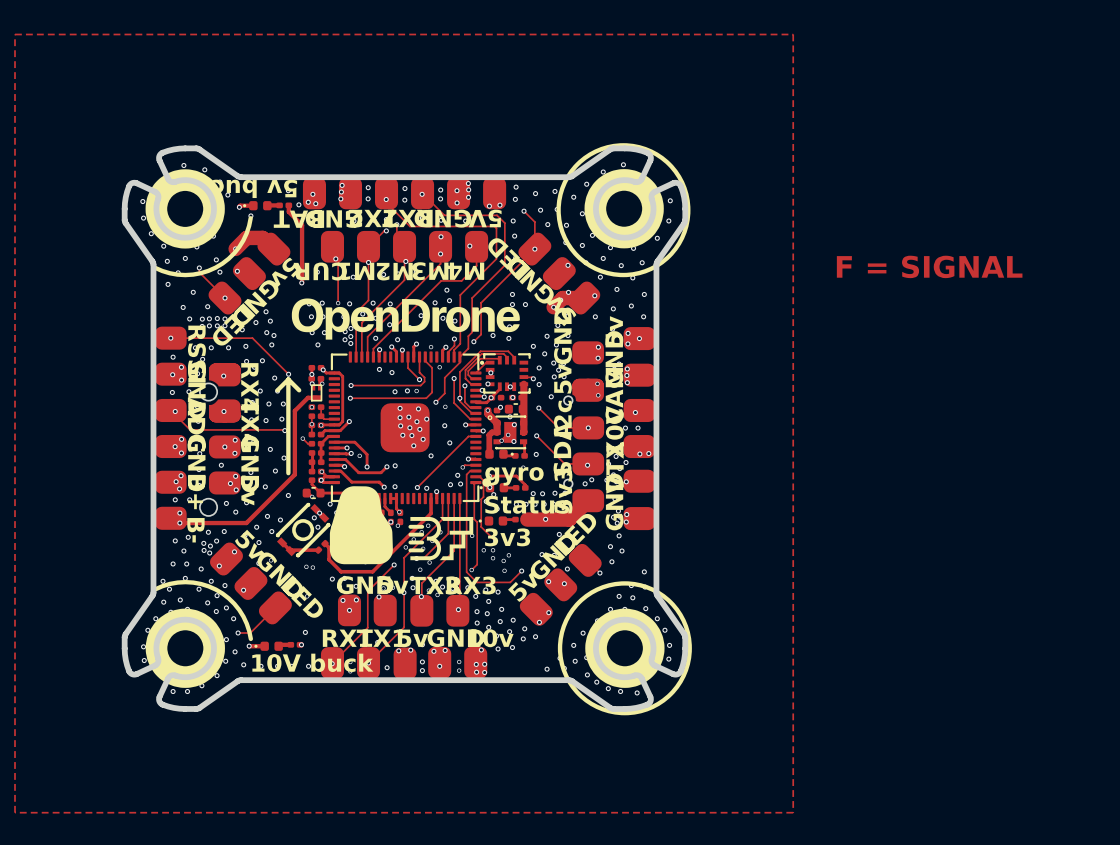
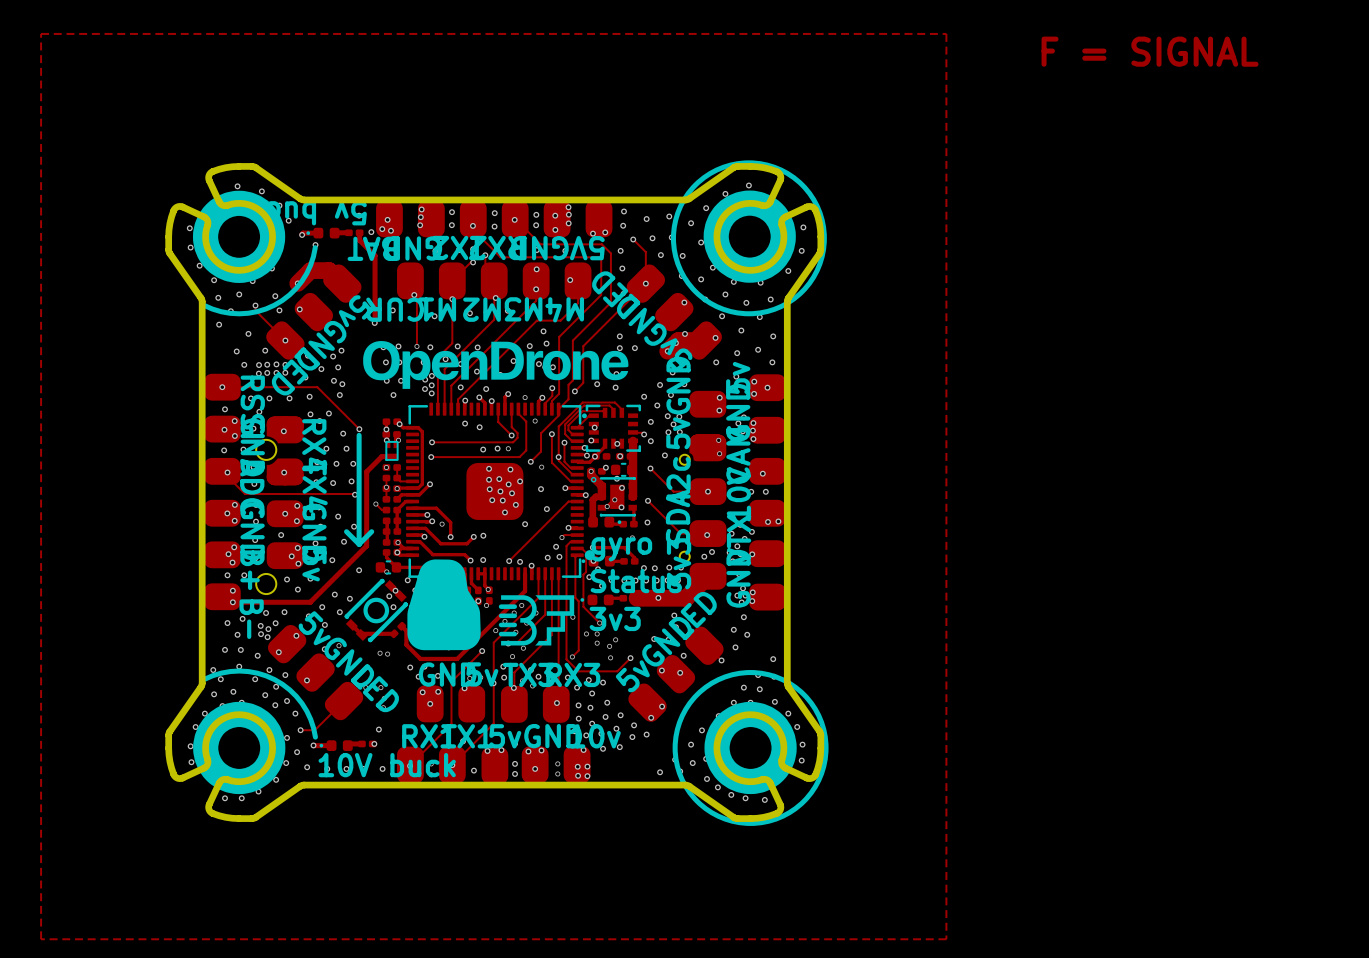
text position: F = SIGNAL (929, 266) -> F = SIGNAL (1150, 51)
via: none -> (341, 350)
line: (277, 390) (288, 379) (299, 390) -> none
line: none -> (346, 531) (359, 544) (371, 531)

